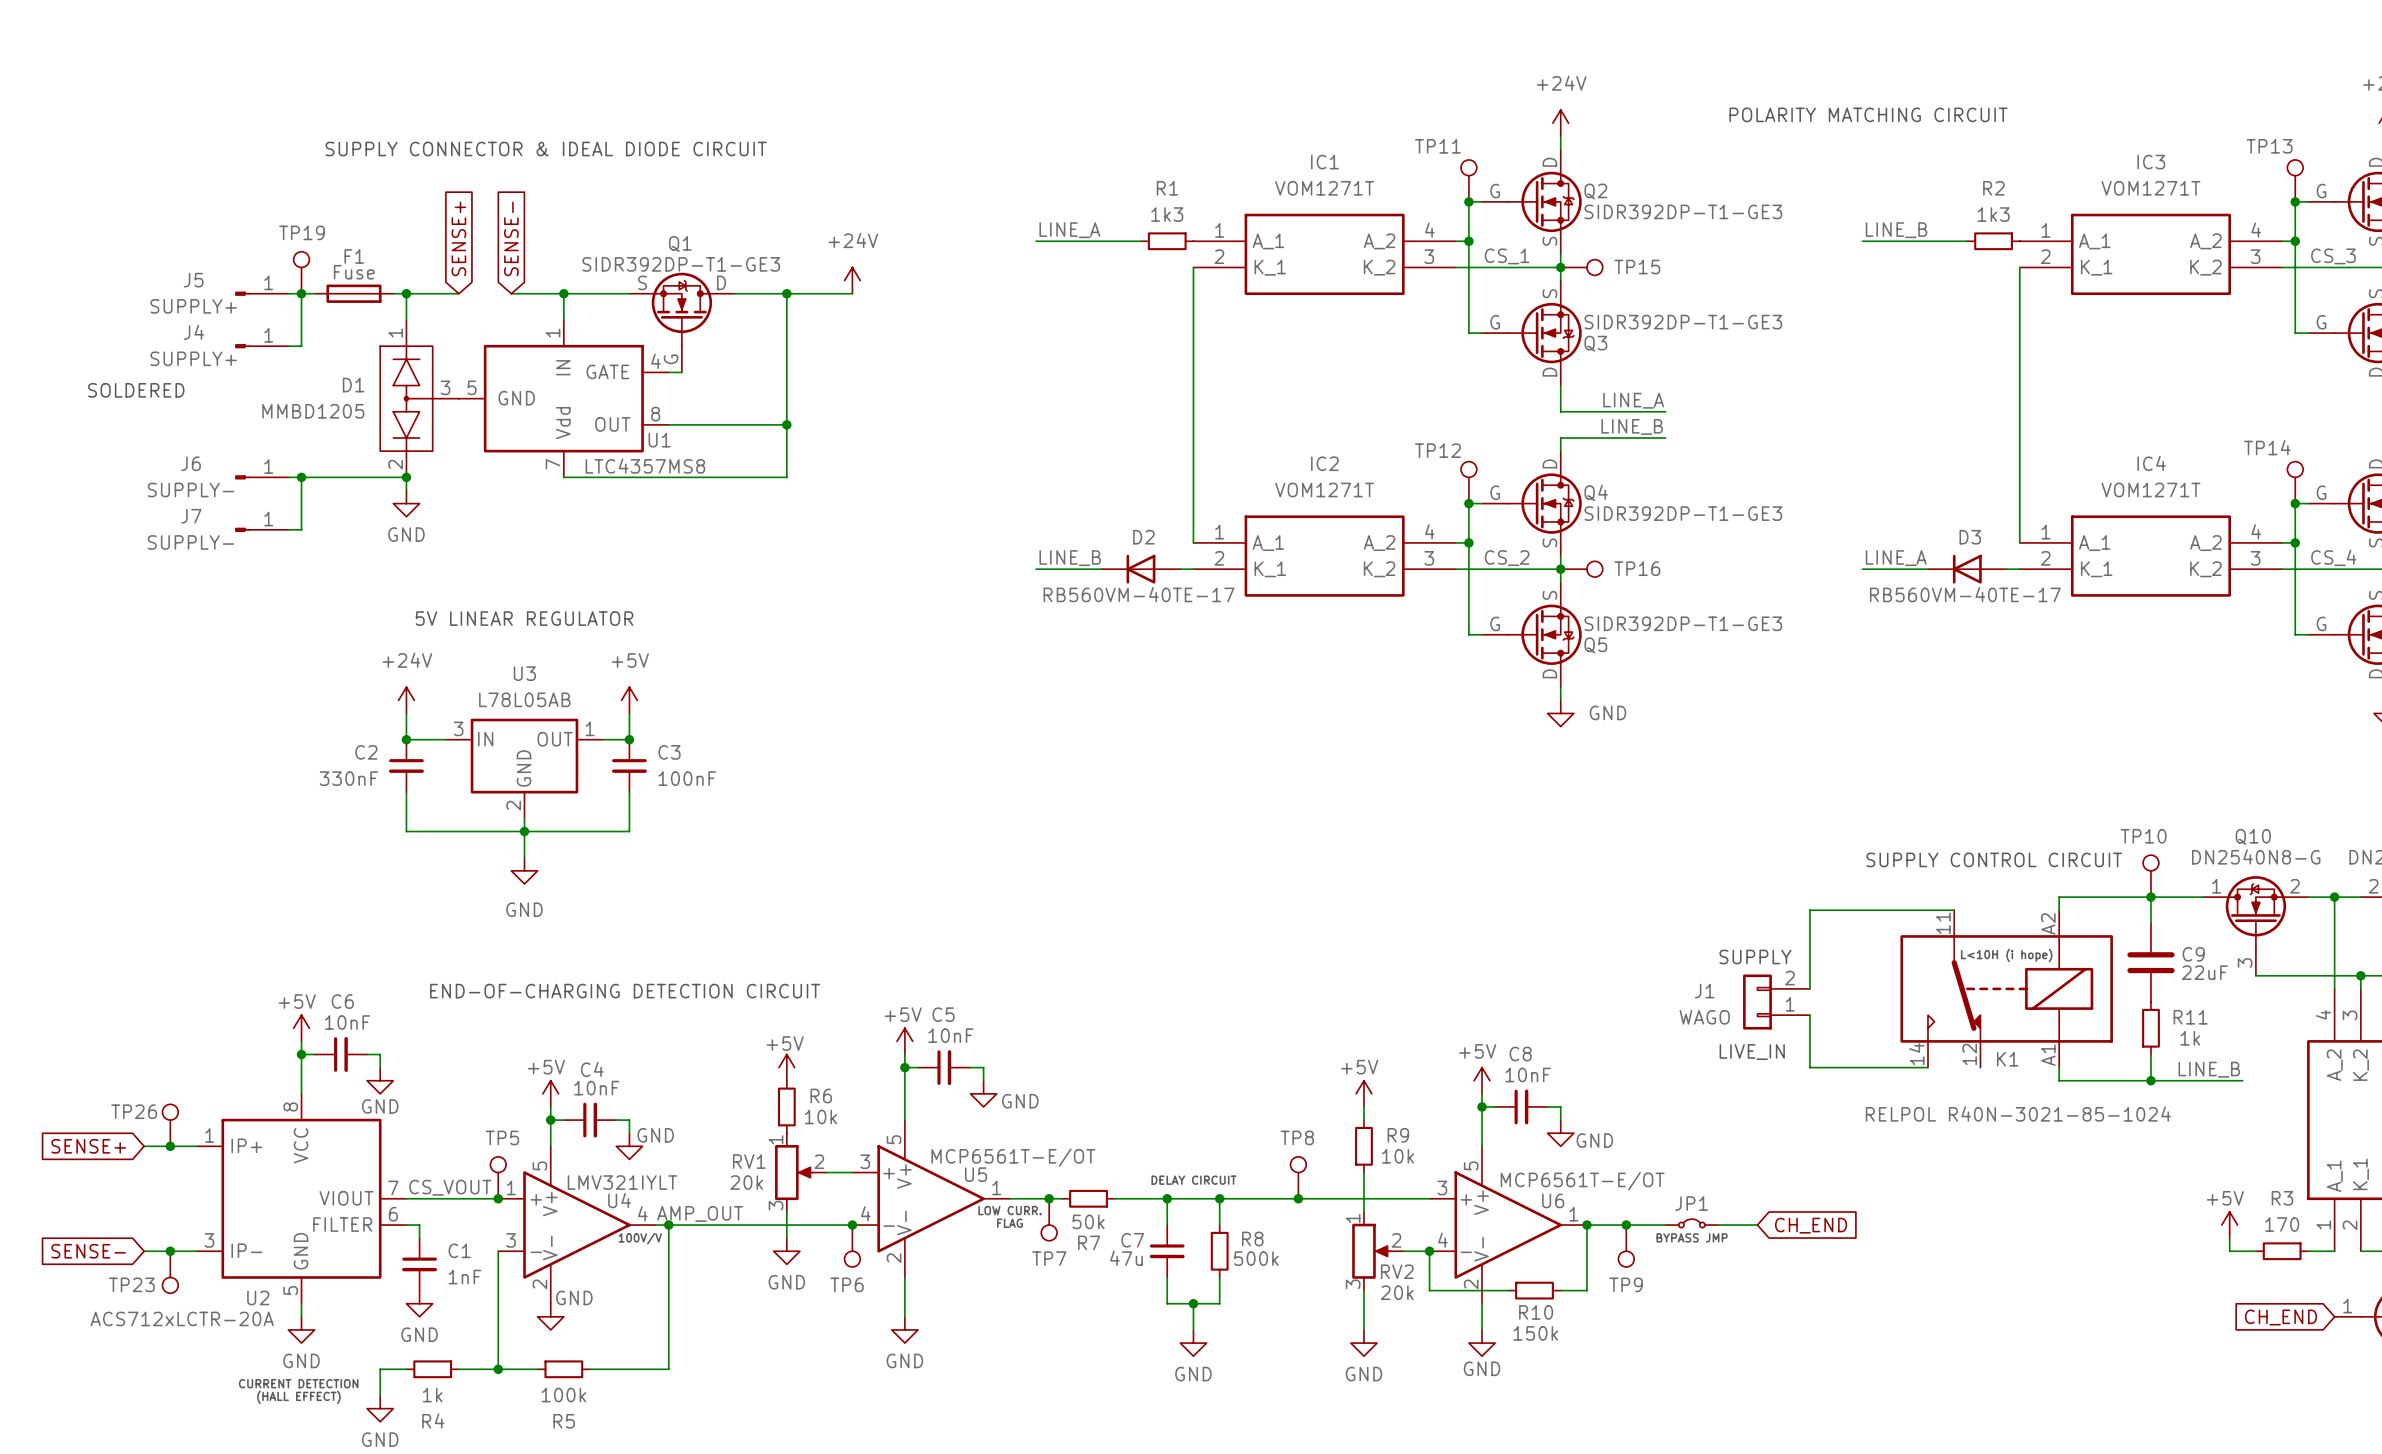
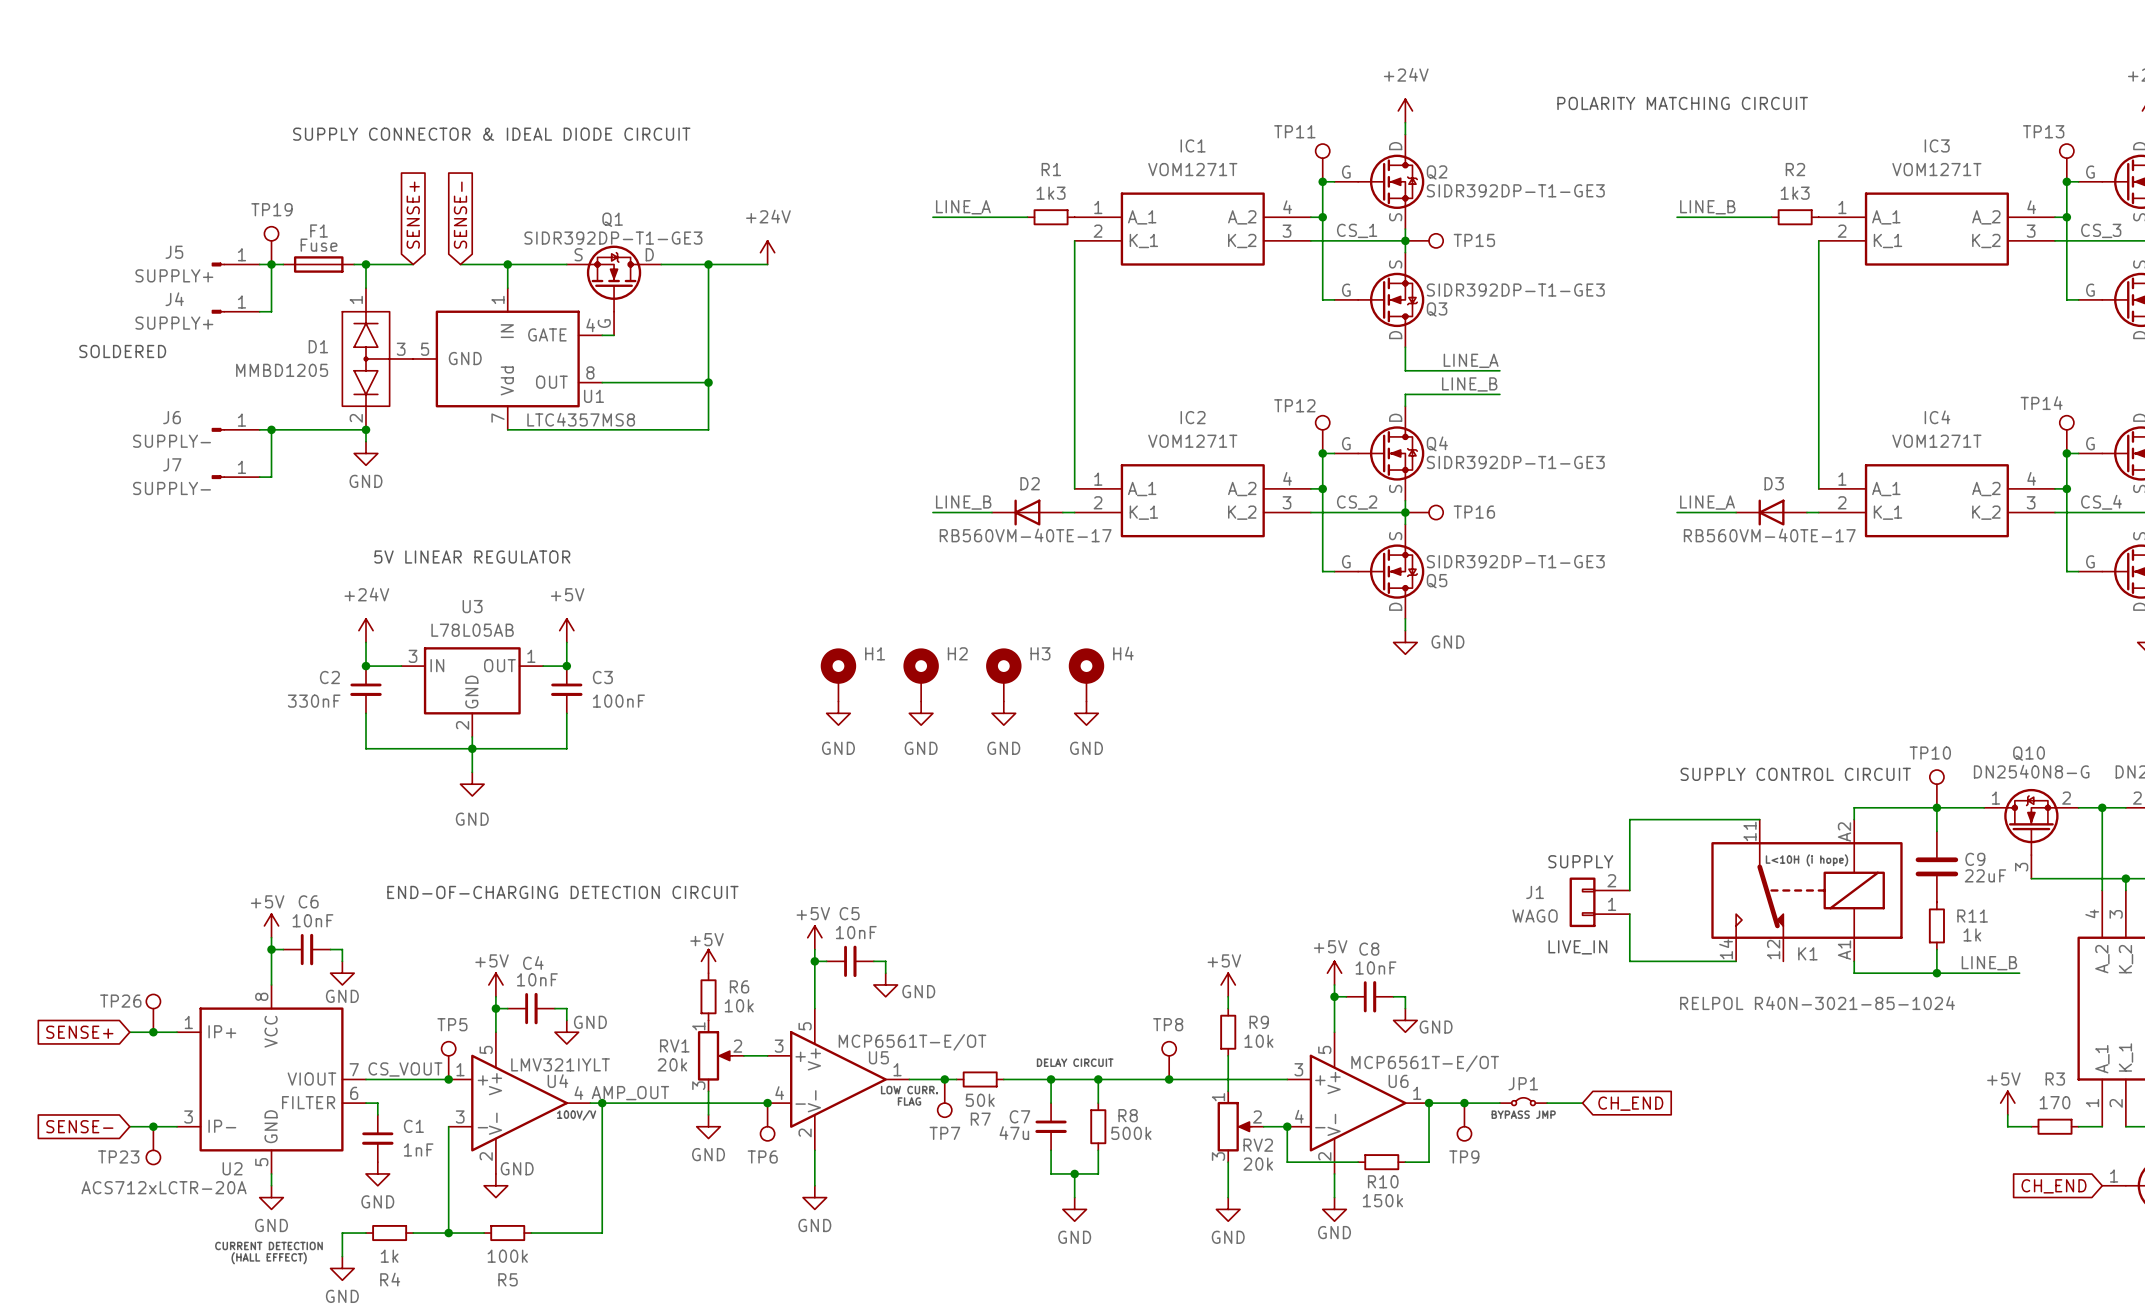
H1: none -> (838, 674)
H2: none -> (921, 674)
H3: none -> (1003, 674)
H4: none -> (1086, 674)
power symbol: none -> GND (838, 713)
power symbol: none -> GND (921, 713)
power symbol: none -> GND (1003, 713)
power symbol: none -> GND (1086, 713)

